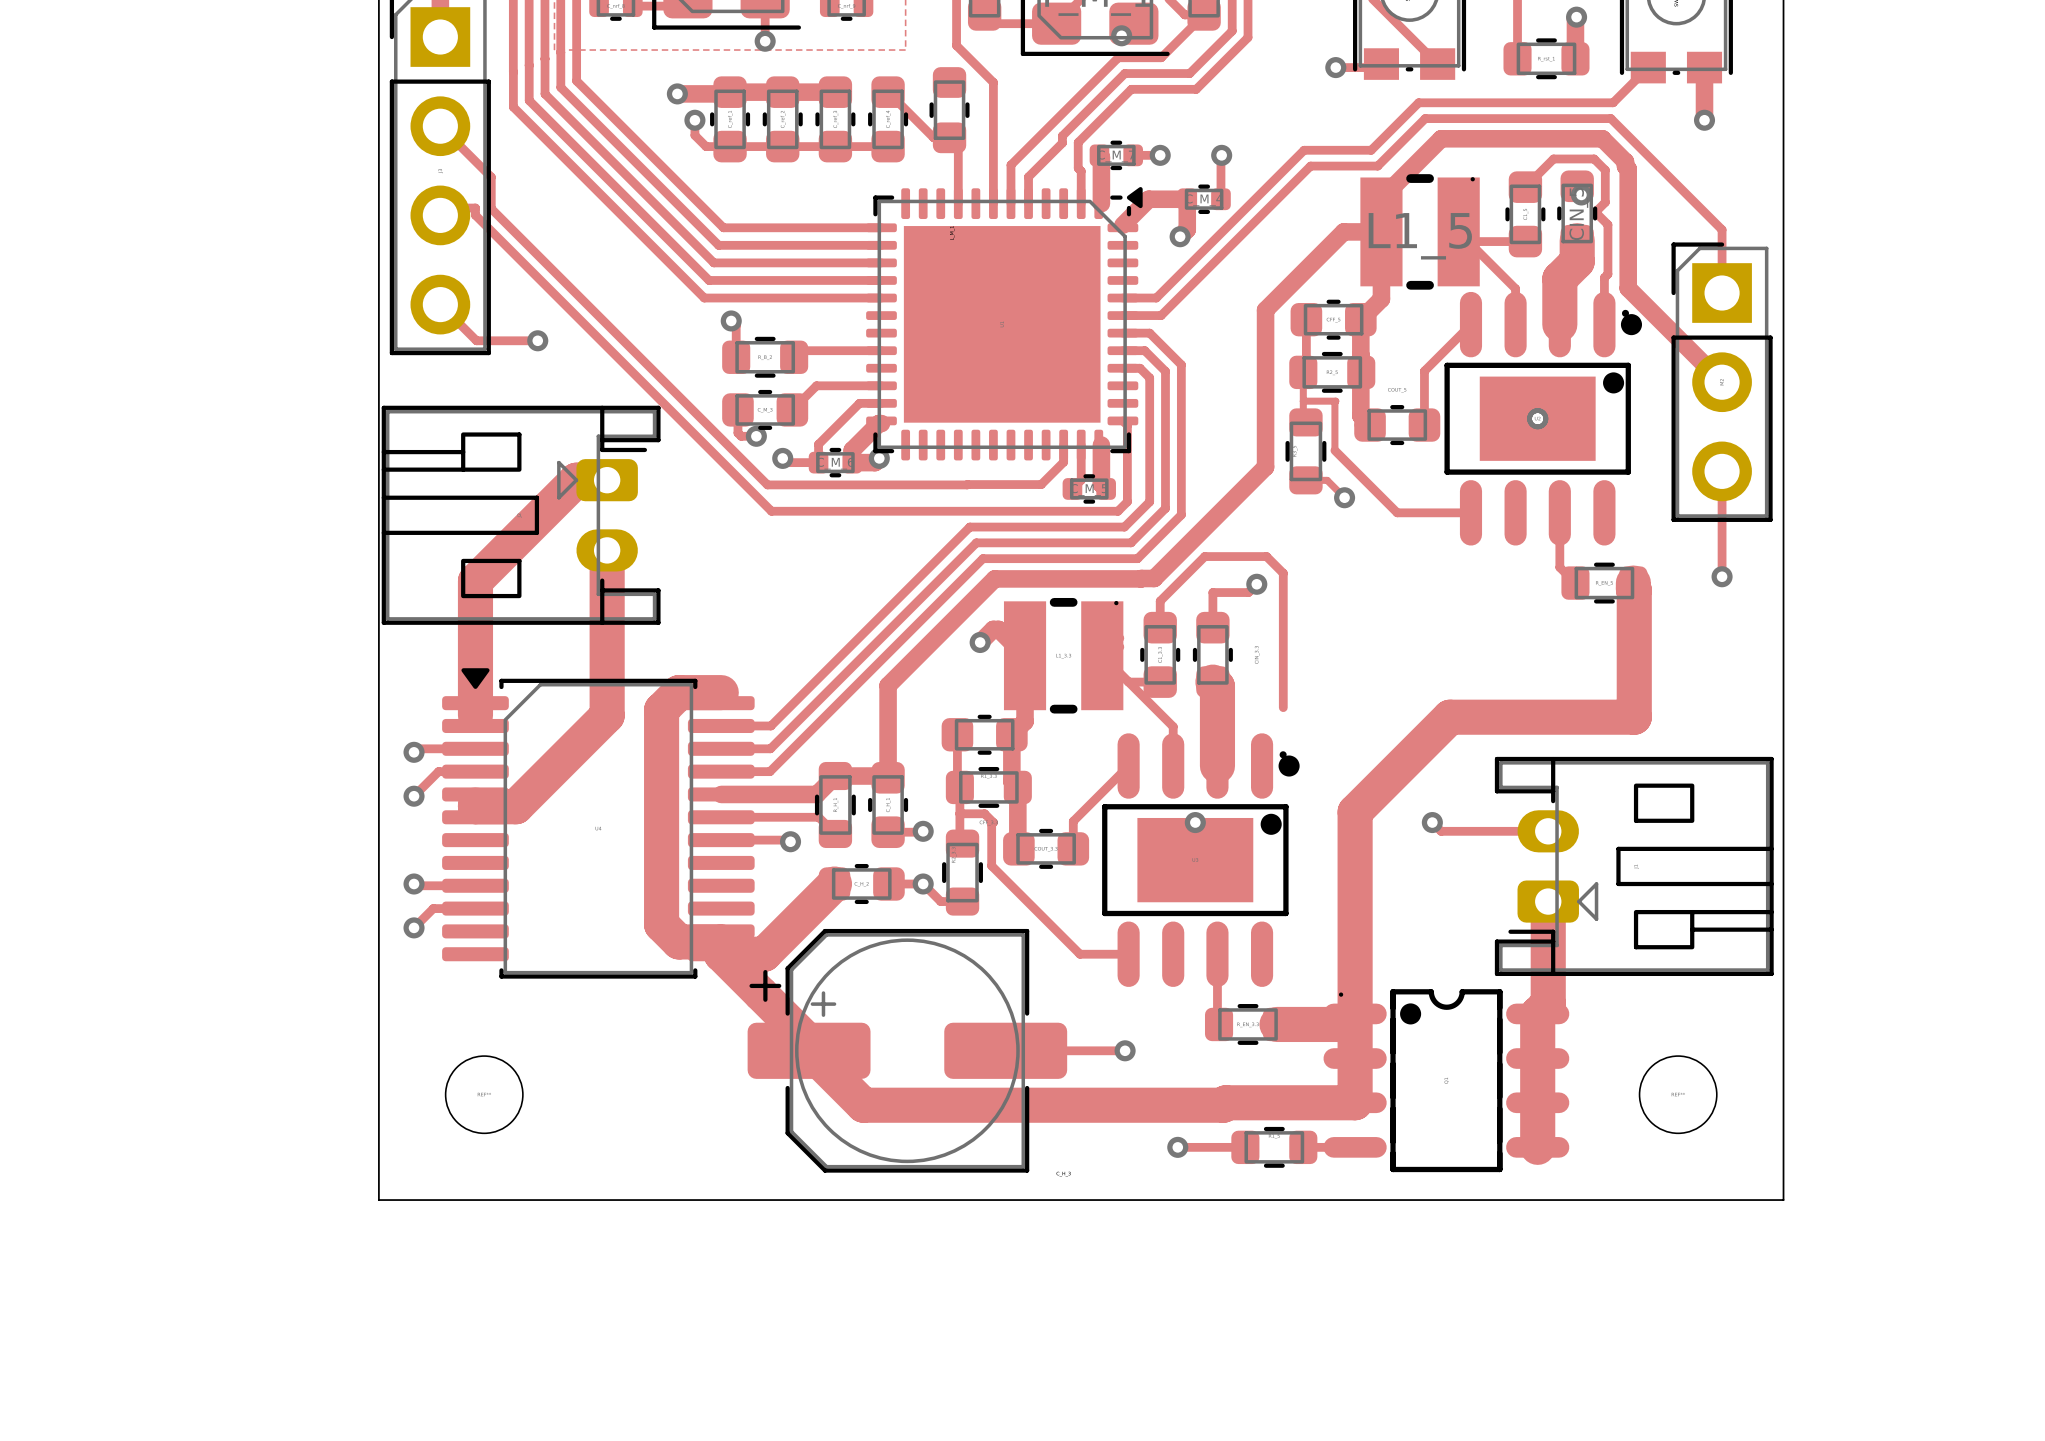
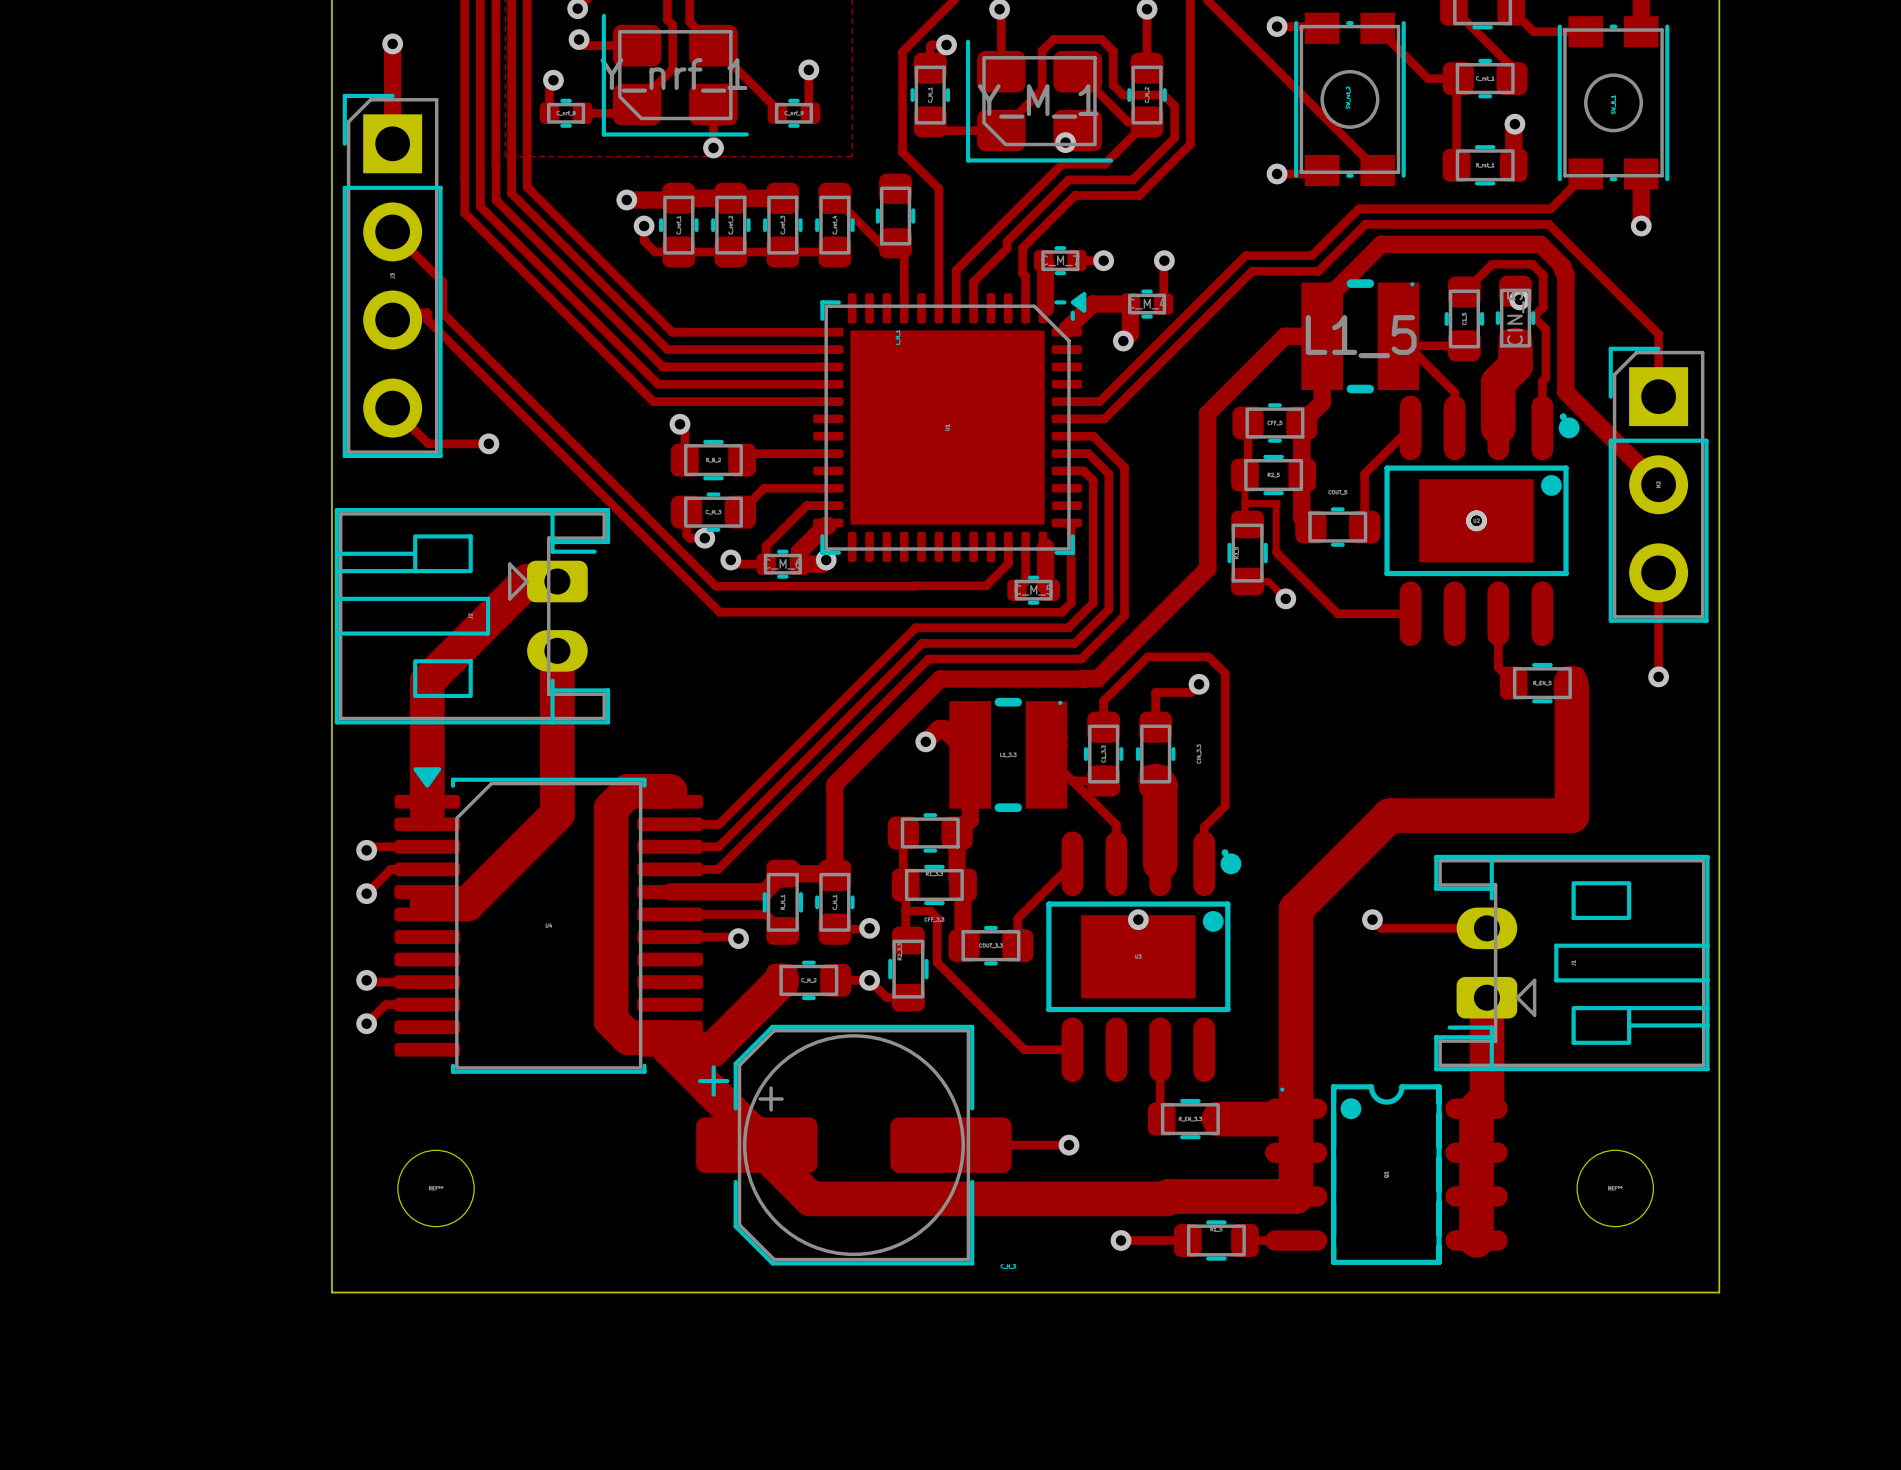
top track: none -> (1225, 806) (1204, 827) (1204, 863)

